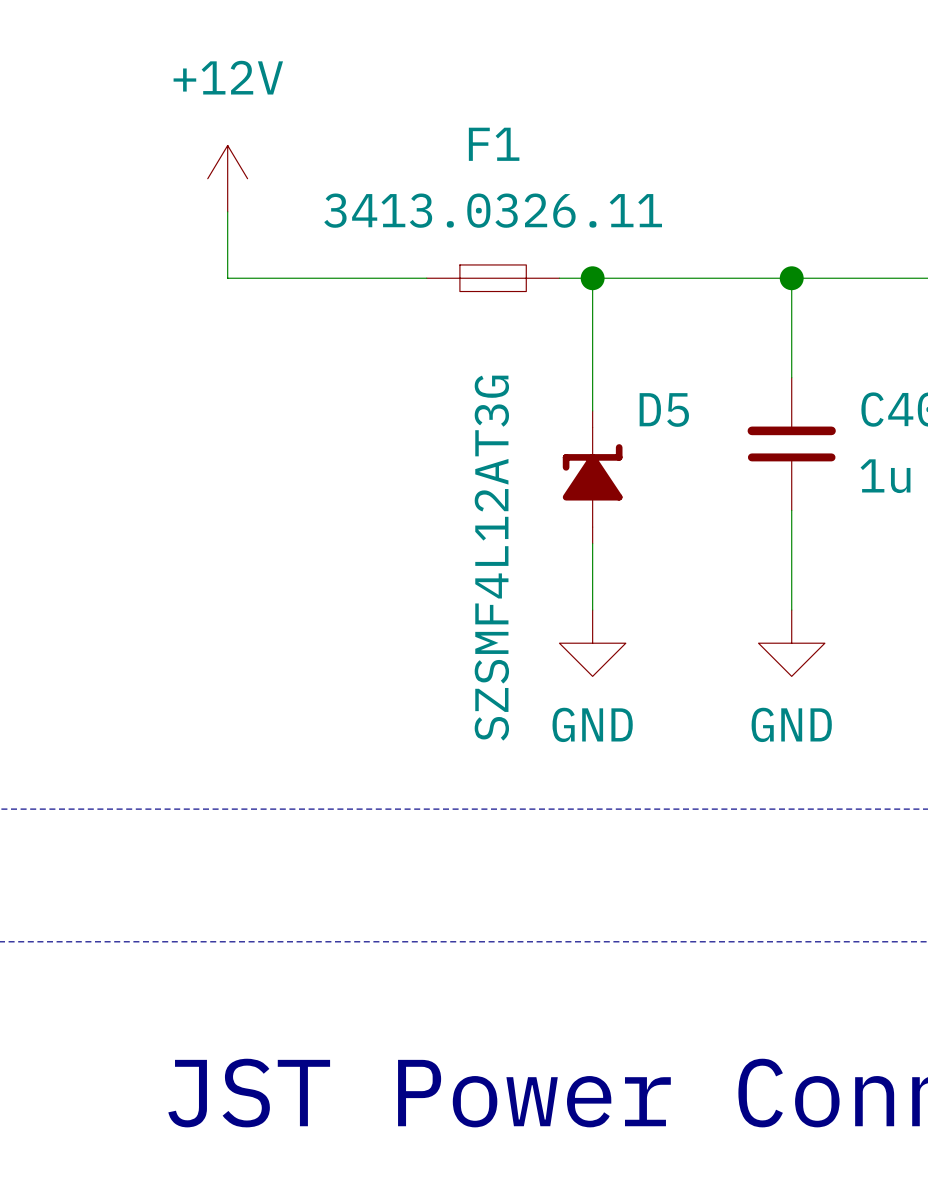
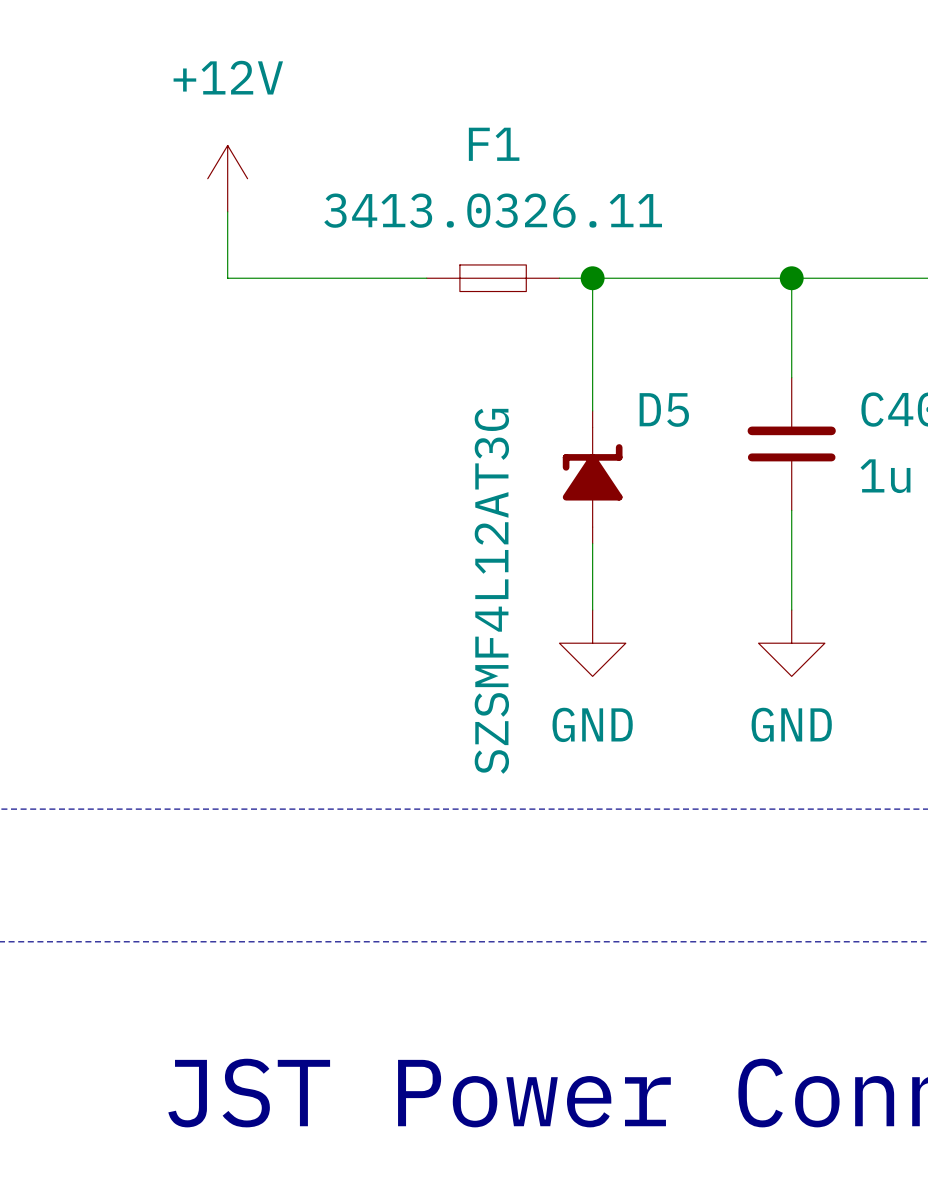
D5 text position: SZSMF4L12AT3G (491, 558) -> SZSMF4L12AT3G (491, 591)

